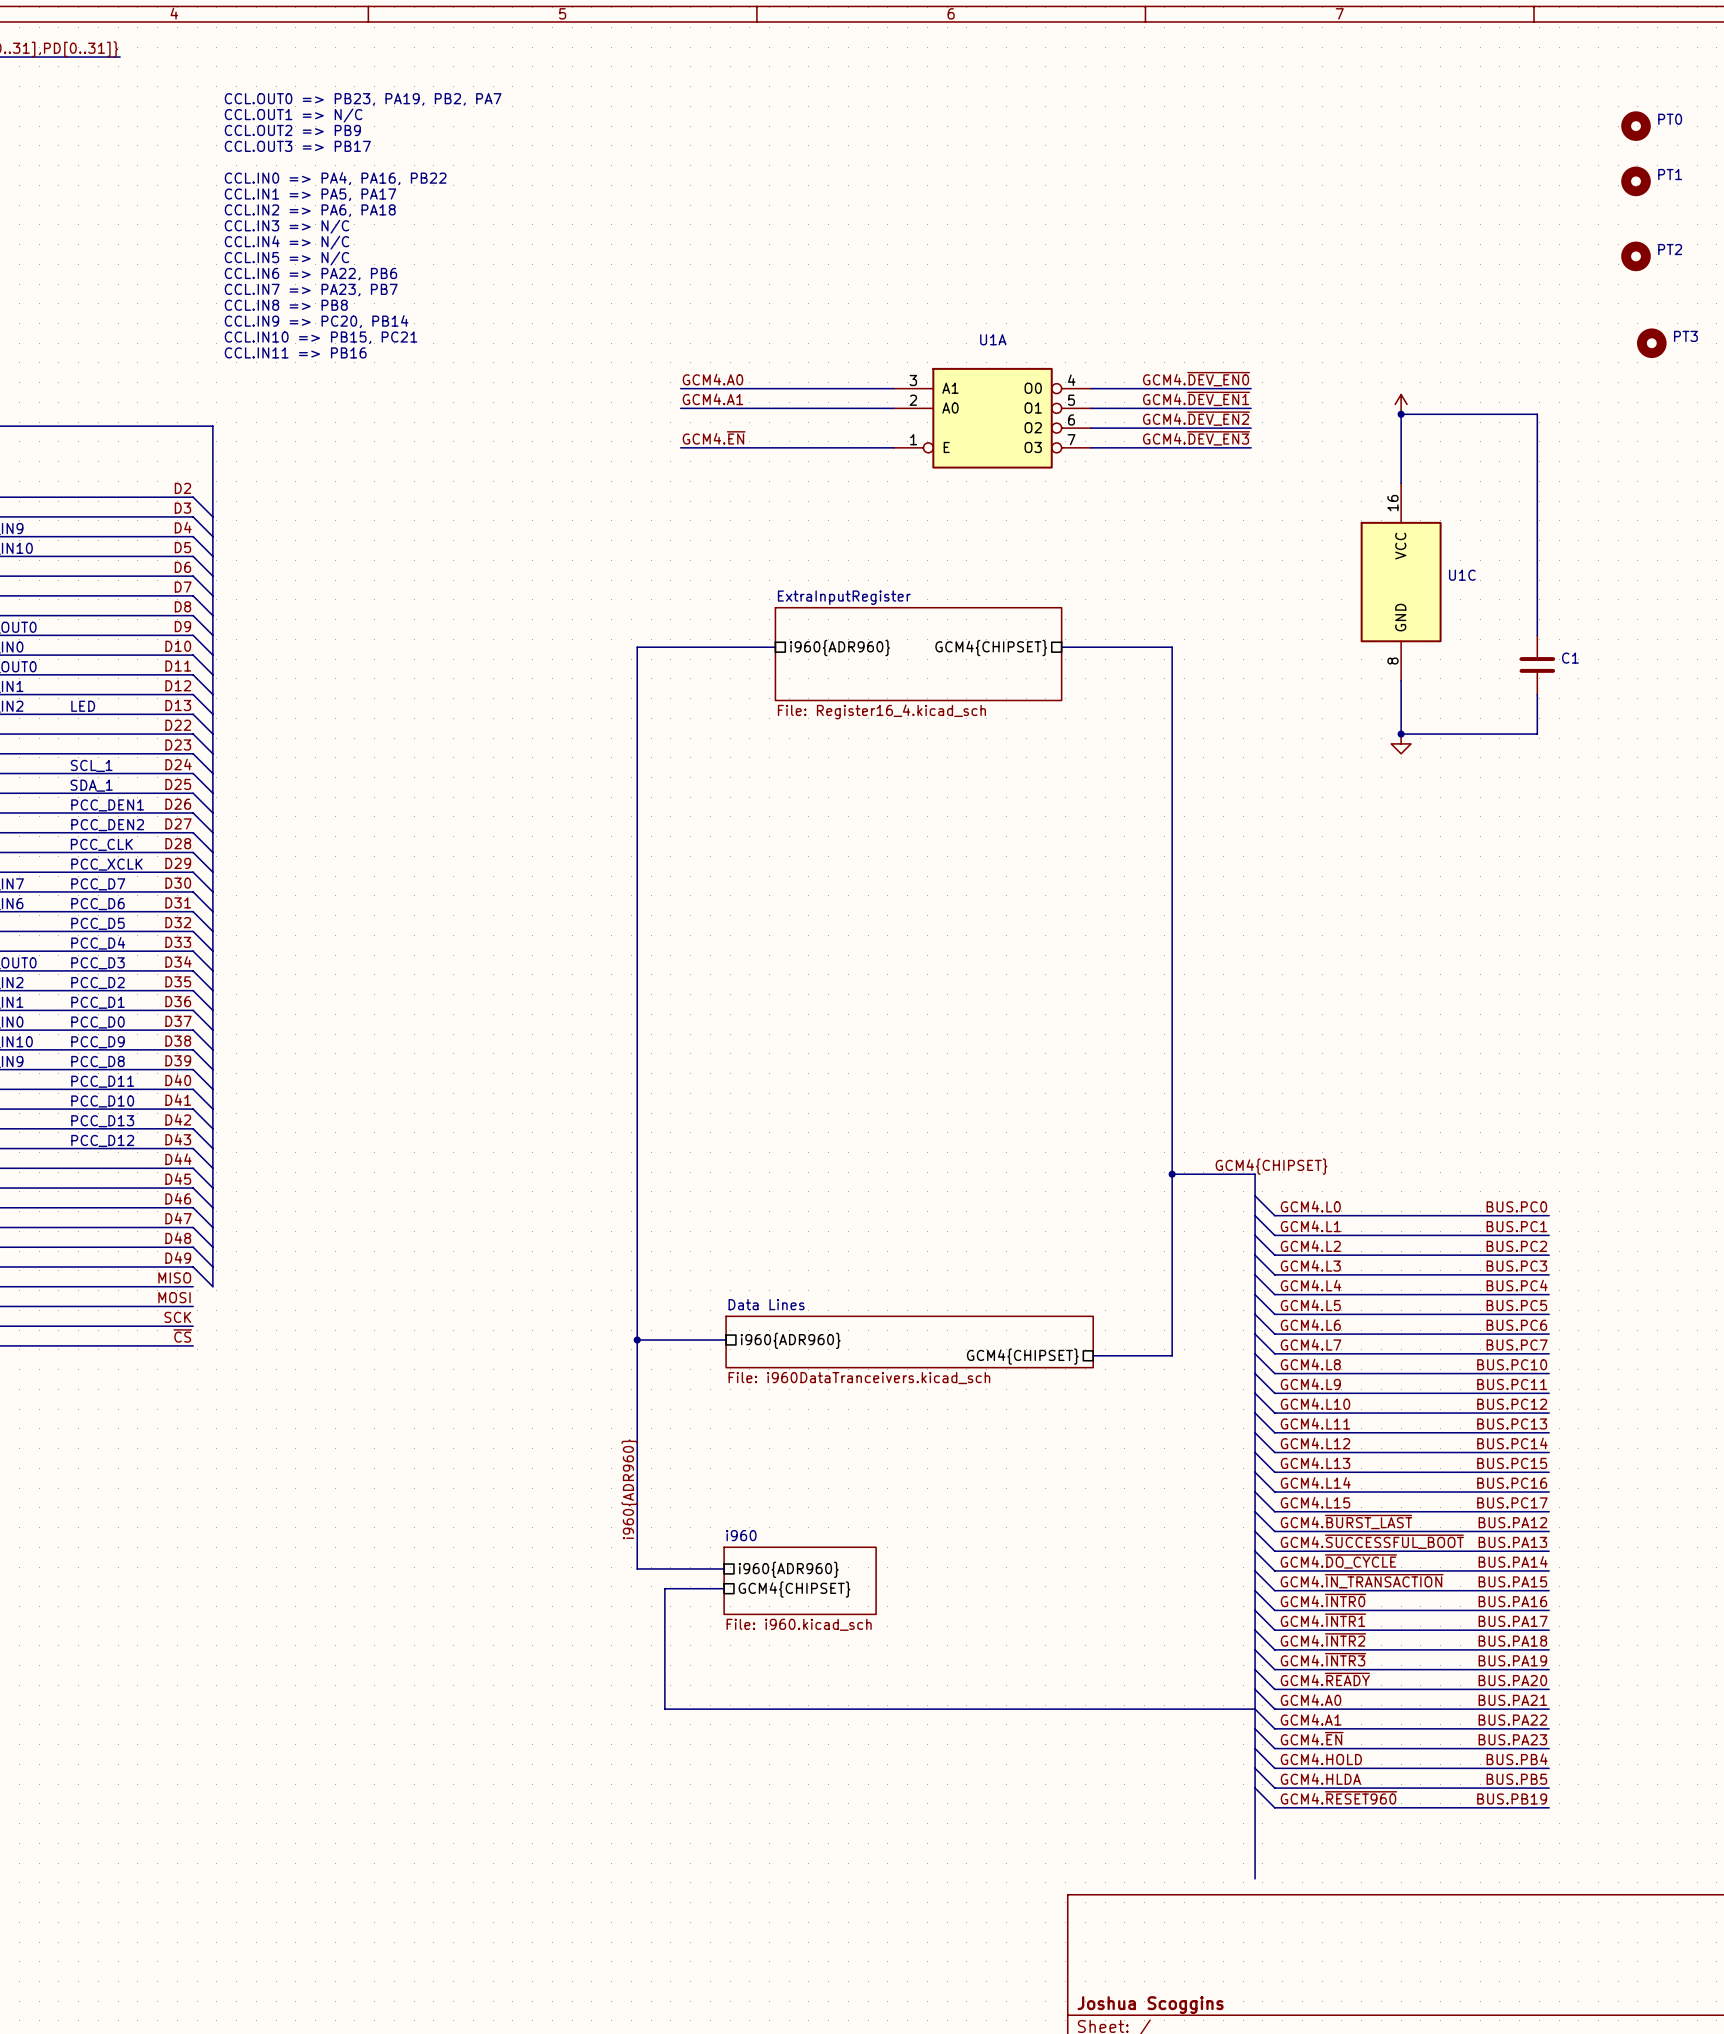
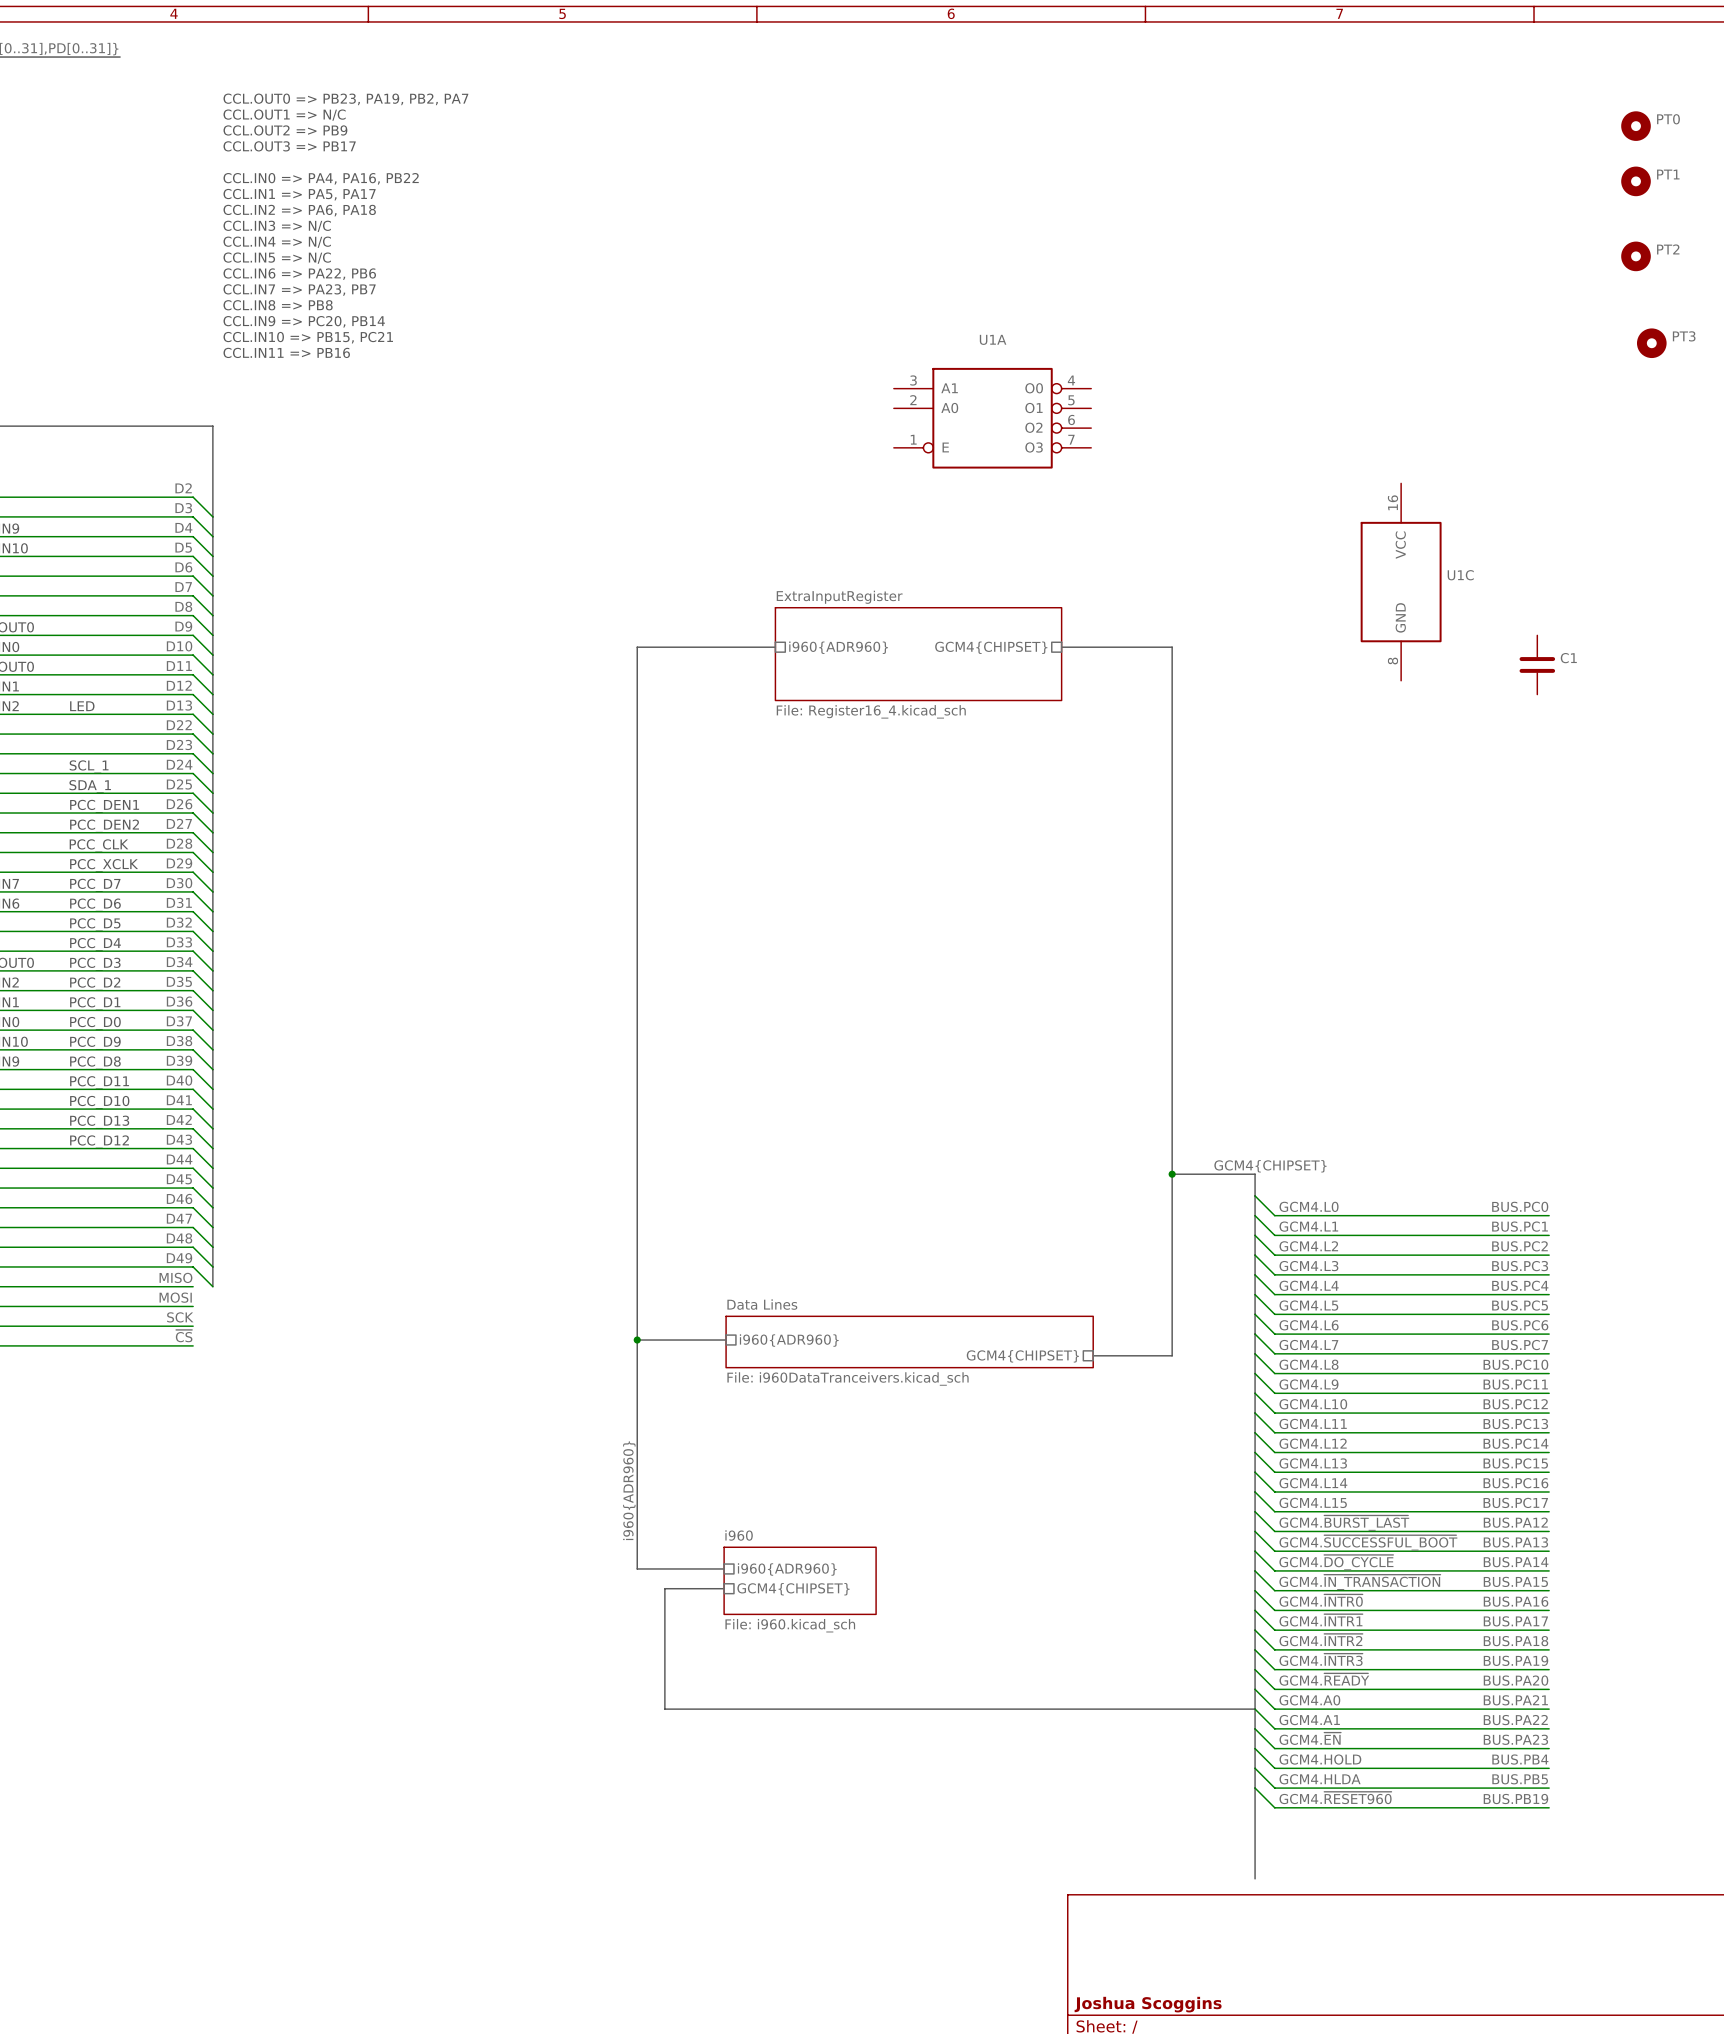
label: GCM4.A0 (712, 379) -> none
label: GCM4.~{DEV_EN0} (1196, 379) -> none
wire: (680, 388) (893, 388) -> none
wire: (1091, 388) (1251, 388) -> none
label: GCM4.~{DEV_EN1} (1196, 398) -> none
label: GCM4.A1 (712, 399) -> none
power symbol: (1401, 404) -> none
wire: (680, 408) (893, 408) -> none
wire: (1091, 408) (1251, 408) -> none
junction: (1401, 414) -> none
label: GCM4.~{DEV_EN2} (1196, 418) -> none
wire: (1091, 428) (1251, 428) -> none
label: GCM4.~{EN} (714, 437) -> none
label: GCM4.~{DEV_EN3} (1196, 438) -> none
wire: (680, 447) (893, 447) -> none
wire: (1091, 447) (1251, 447) -> none
wire: (1401, 483) (1401, 414) (1537, 414) (1537, 635) -> none
wire: (1401, 680) (1401, 734) (1537, 734) (1537, 694) -> none
junction: (1401, 734) -> none
power symbol: (1401, 743) -> none

